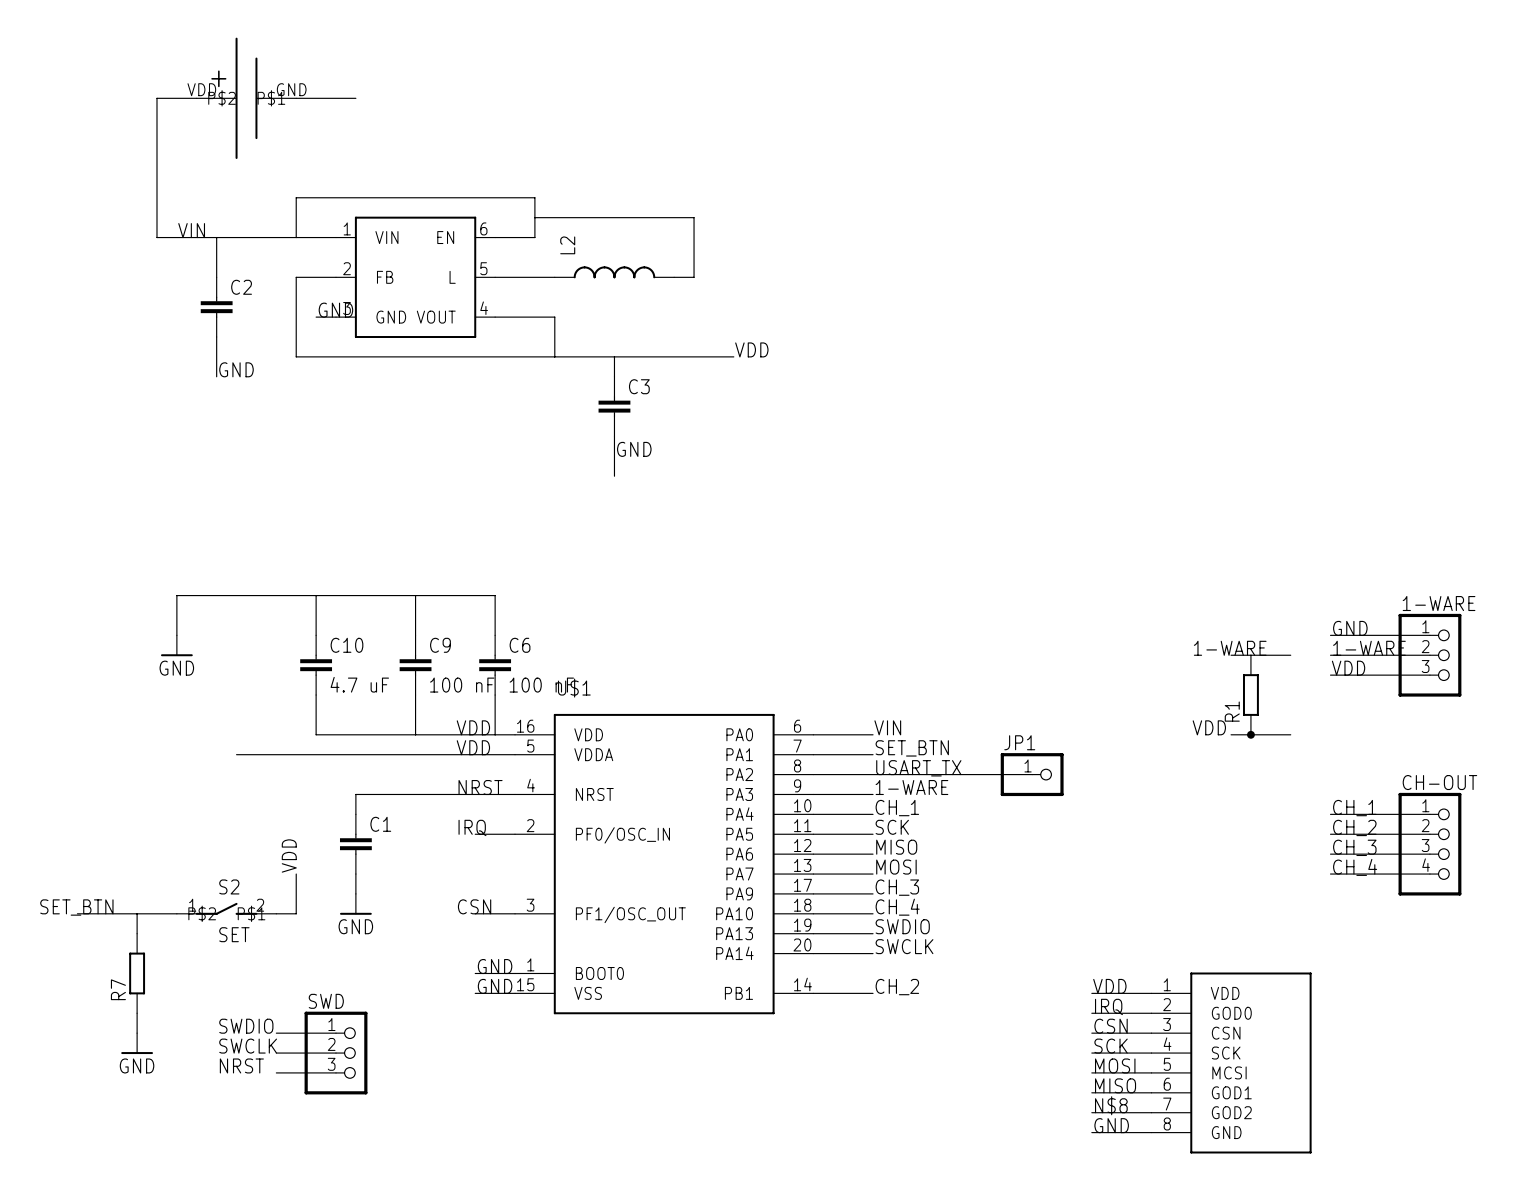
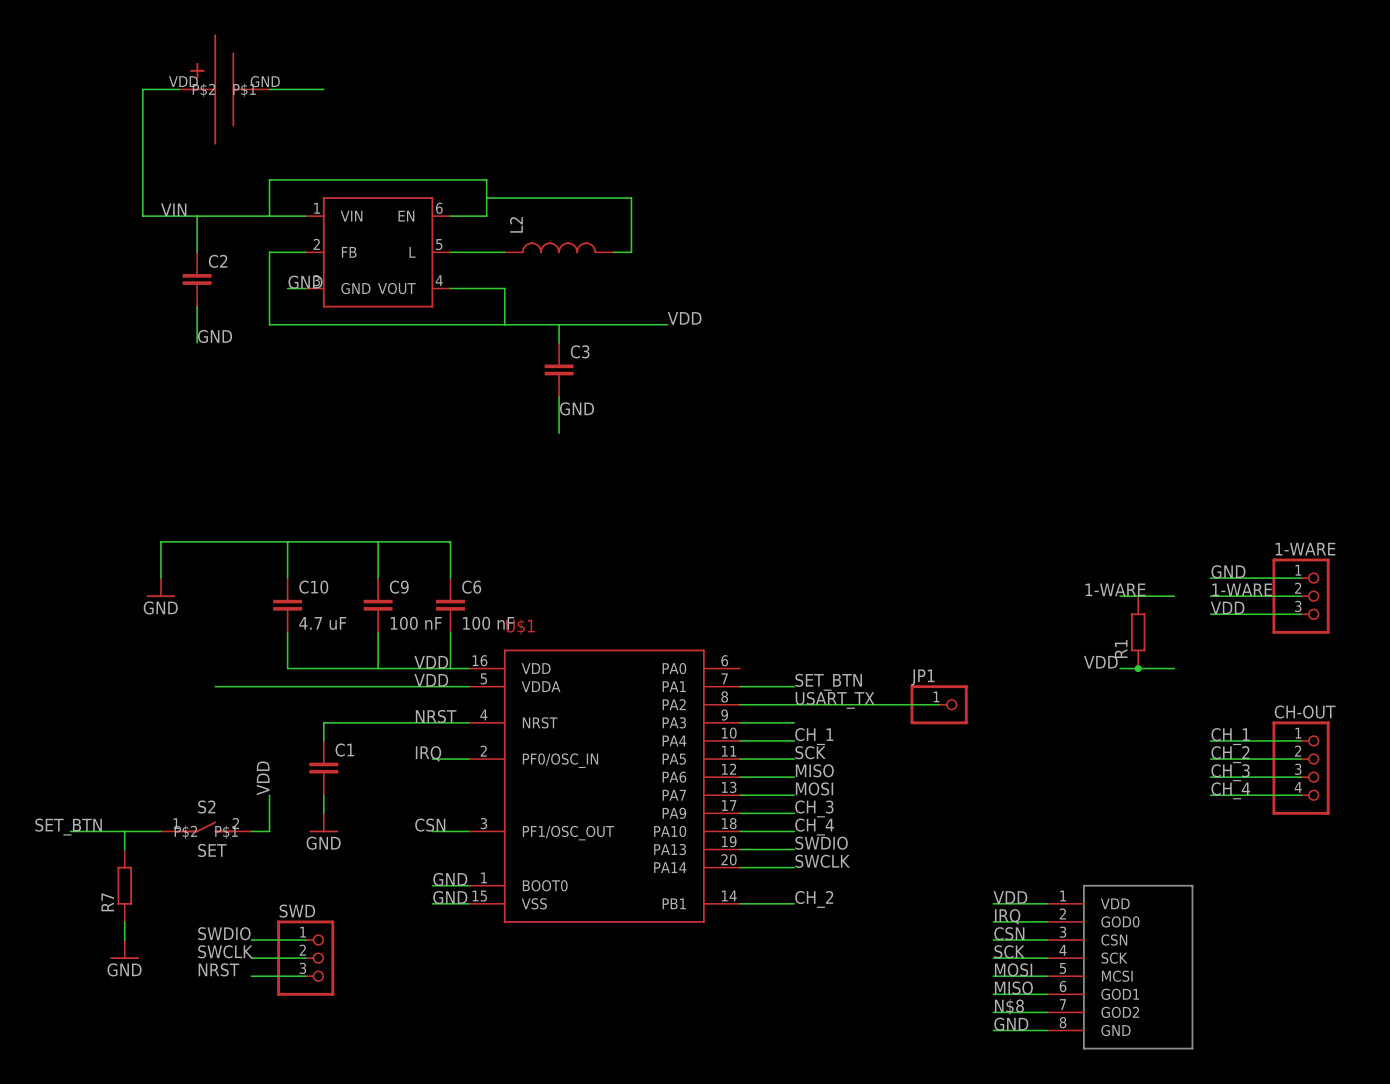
label: VIN (887, 727) -> none
wire: (813, 734) (873, 734) -> none
label: 1-WARE (911, 787) -> none

